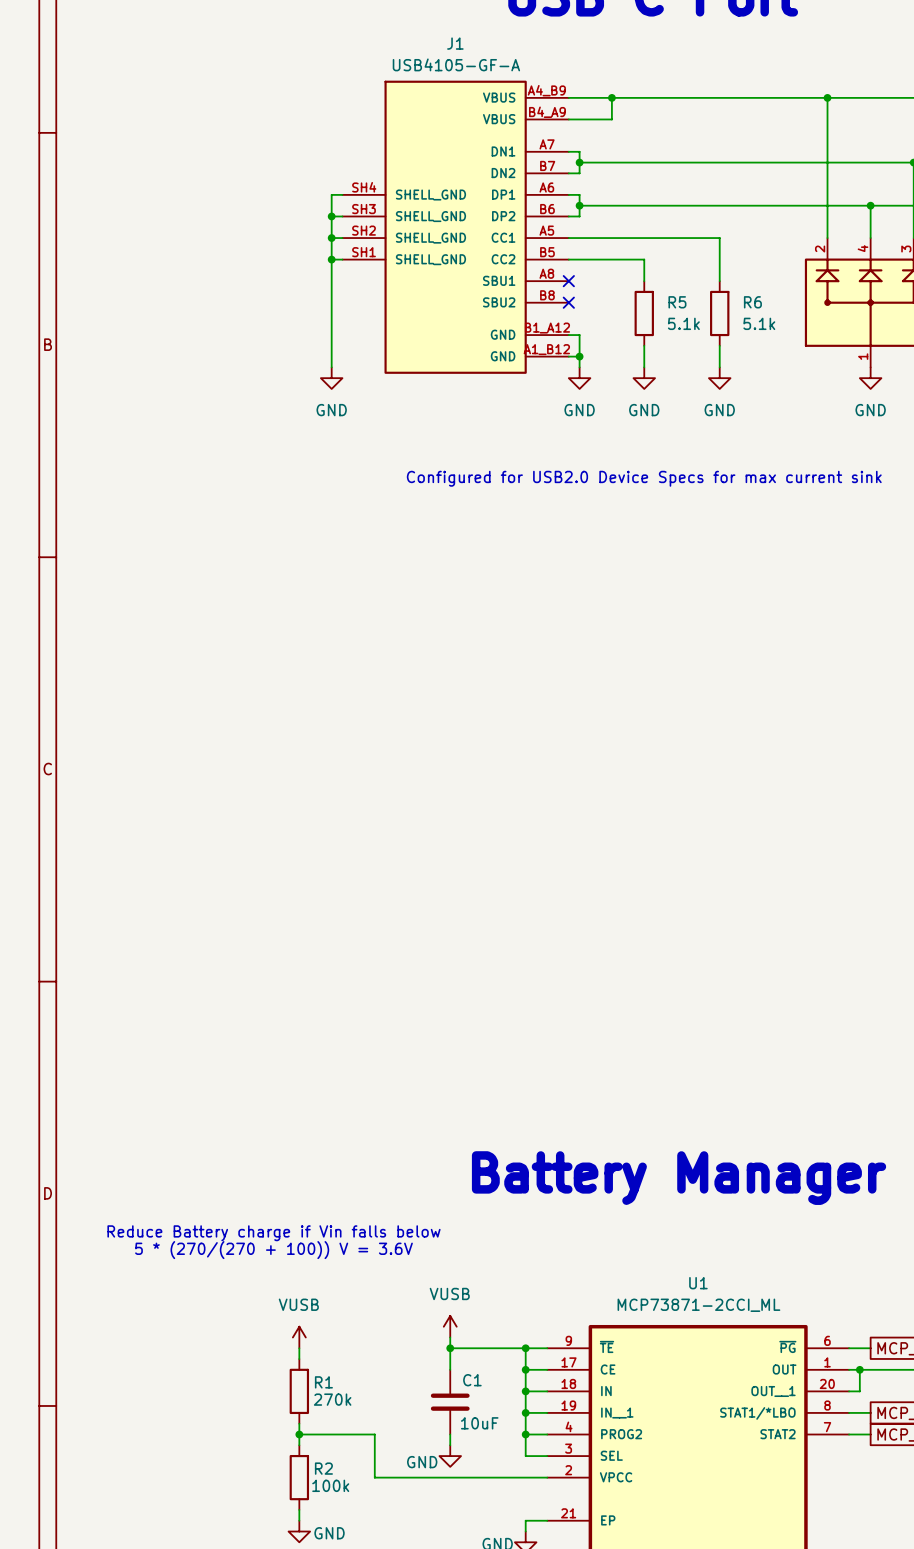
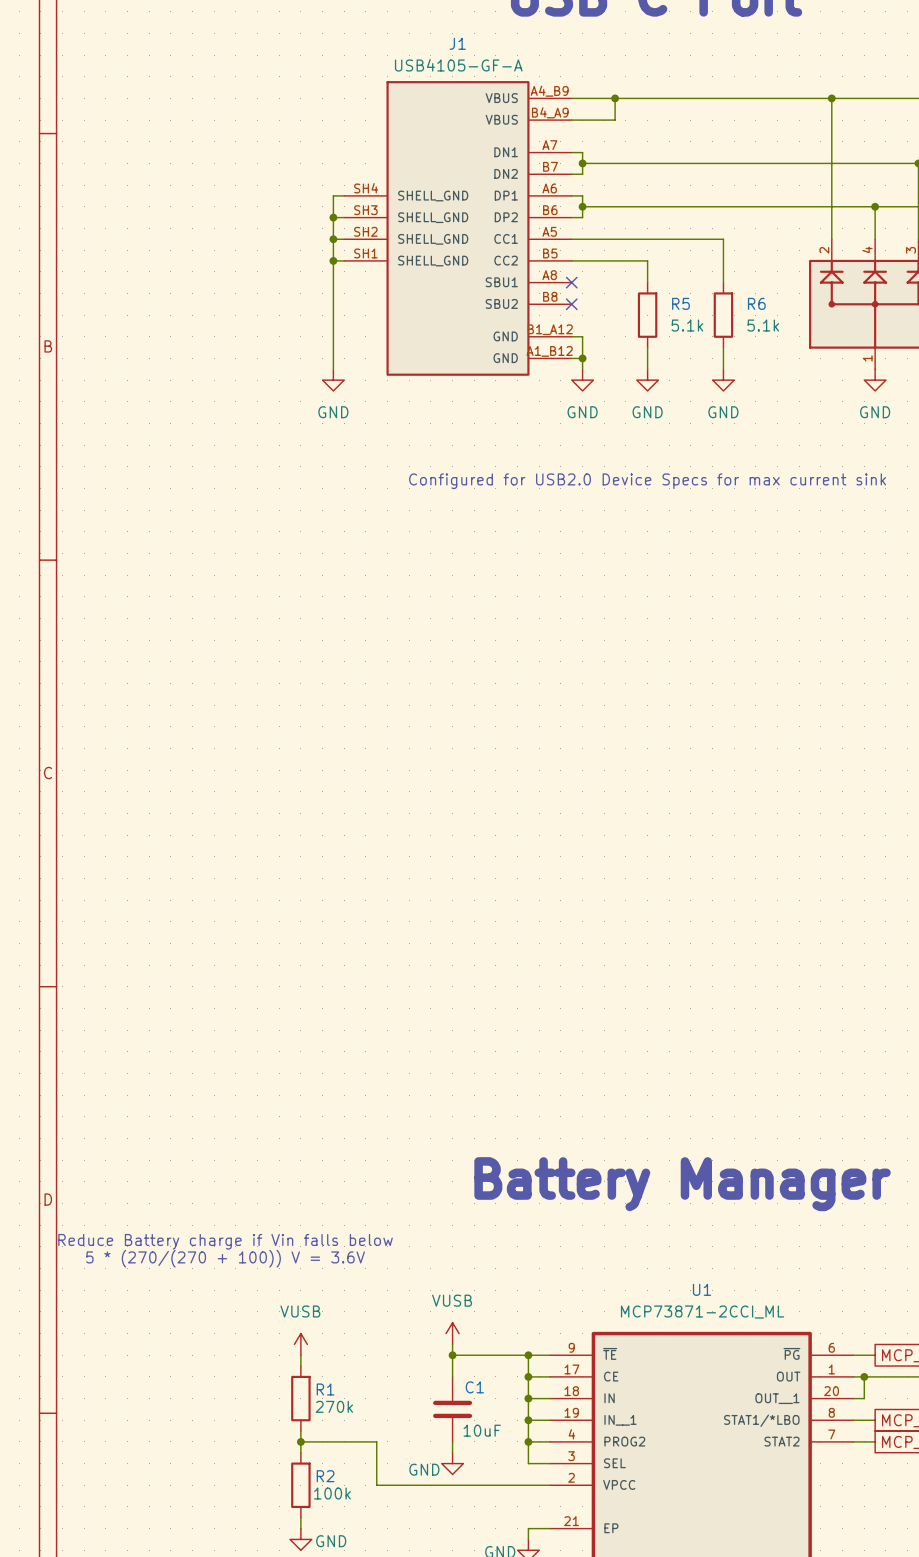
text position: Reduce Battery charge if Vin falls below (273, 1233) -> Reduce Battery charge if Vin falls below (225, 1241)
text position: 5 * (270/(270 + 100)) V = 3.6V (273, 1250) -> 5 * (270/(270 + 100)) V = 3.6V (225, 1258)

